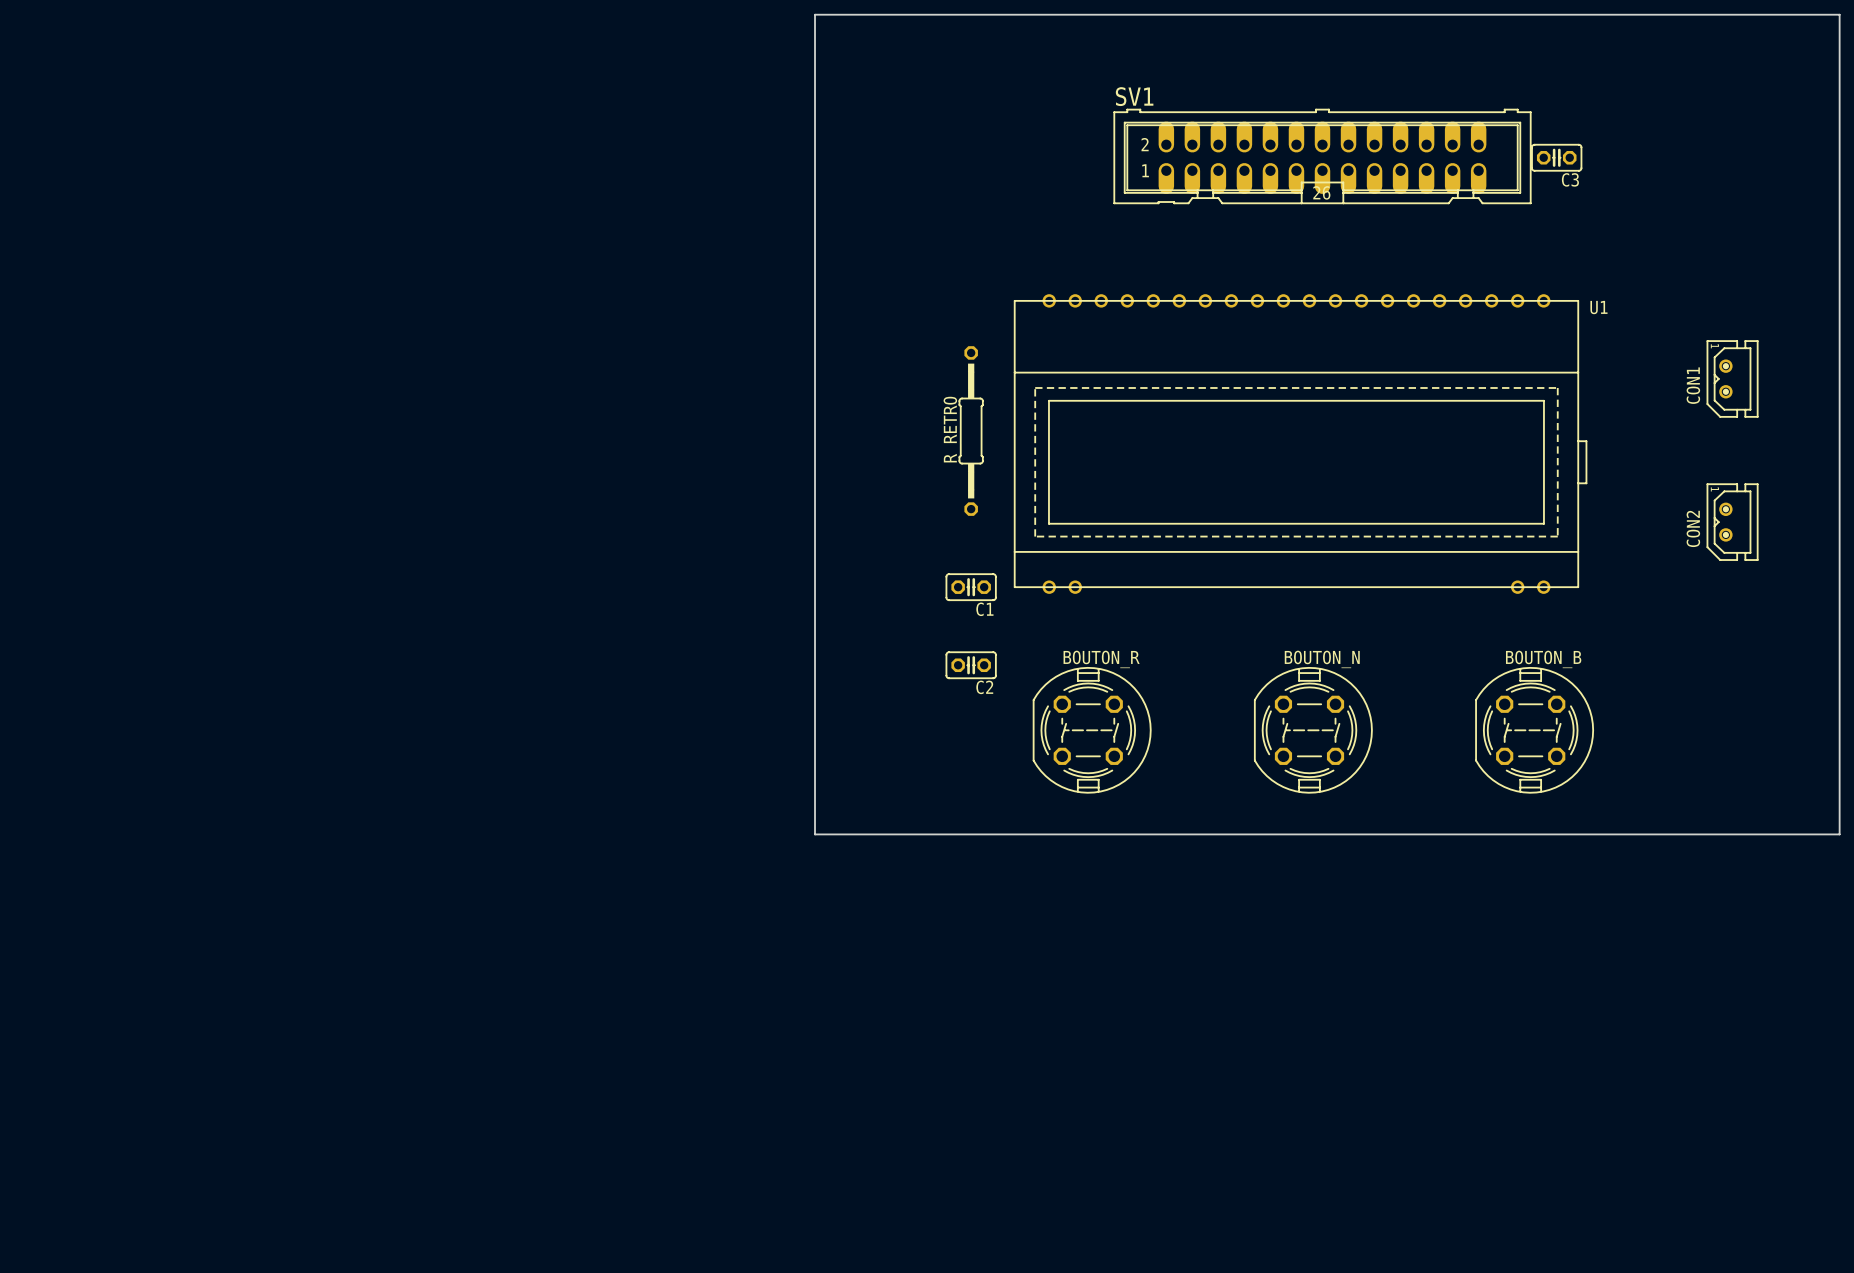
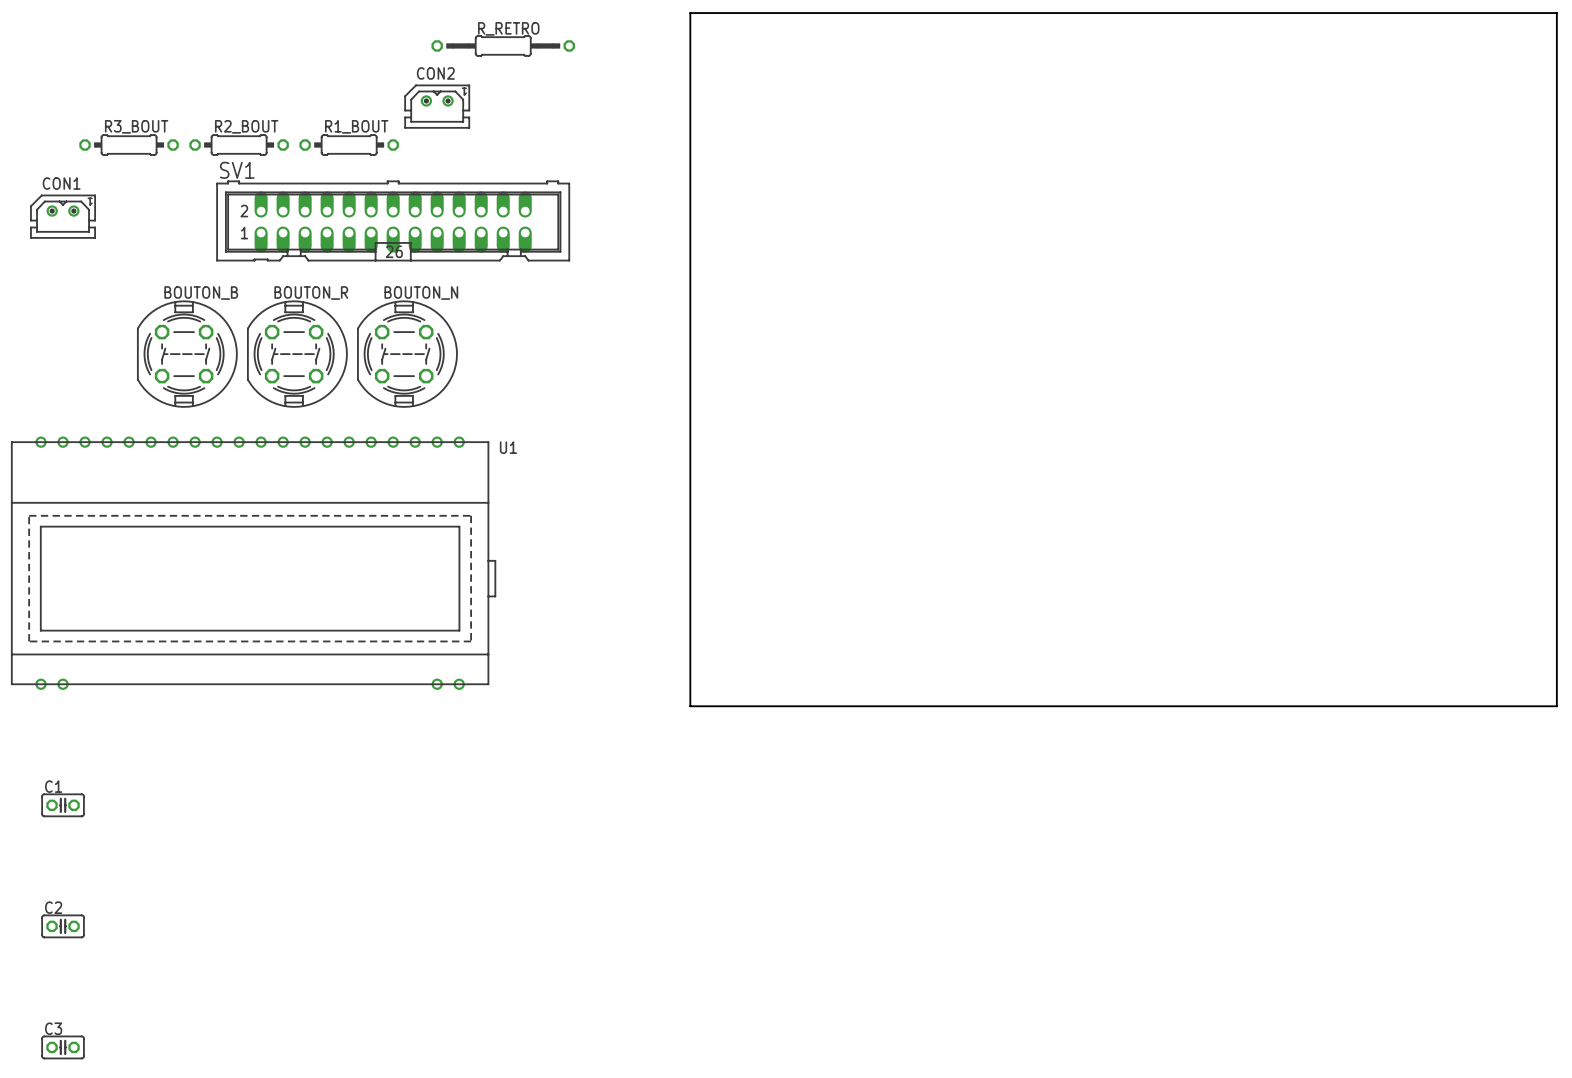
R_RETRO: none -> (503, 45)
SV1 position: (1322, 156) -> (393, 220)
C3 position: (1556, 157) -> (63, 1047)
R3_BOUT: none -> (129, 145)
R2_BOUT: none -> (239, 145)
R1_BOUT: none -> (349, 145)
C3 name position: C3 (1570, 179) -> C3 (53, 1028)
CON1 rotation: 0° (1732, 378) -> 90° clockwise (63, 216)
CON1 position: (1732, 378) -> (63, 216)
BOUTON_B: none -> (187, 354)
BOUTON_R: none -> (297, 354)
BOUTON_N: none -> (407, 354)
R_RETRO: (971, 431) -> none
U1 position: (1300, 444) -> (253, 563)
CON2 rotation: 0° (1732, 522) -> 90° clockwise (437, 106)
CON2 position: (1732, 522) -> (437, 106)
C1 position: (971, 587) -> (63, 805)
C1 name position: C1 (984, 609) -> C1 (53, 786)
C2 position: (971, 665) -> (63, 926)
C2 name position: C2 (984, 687) -> C2 (53, 907)
BOUTON_R: (1092, 730) -> none
BOUTON_N: (1313, 730) -> none
BOUTON_B: (1534, 730) -> none

